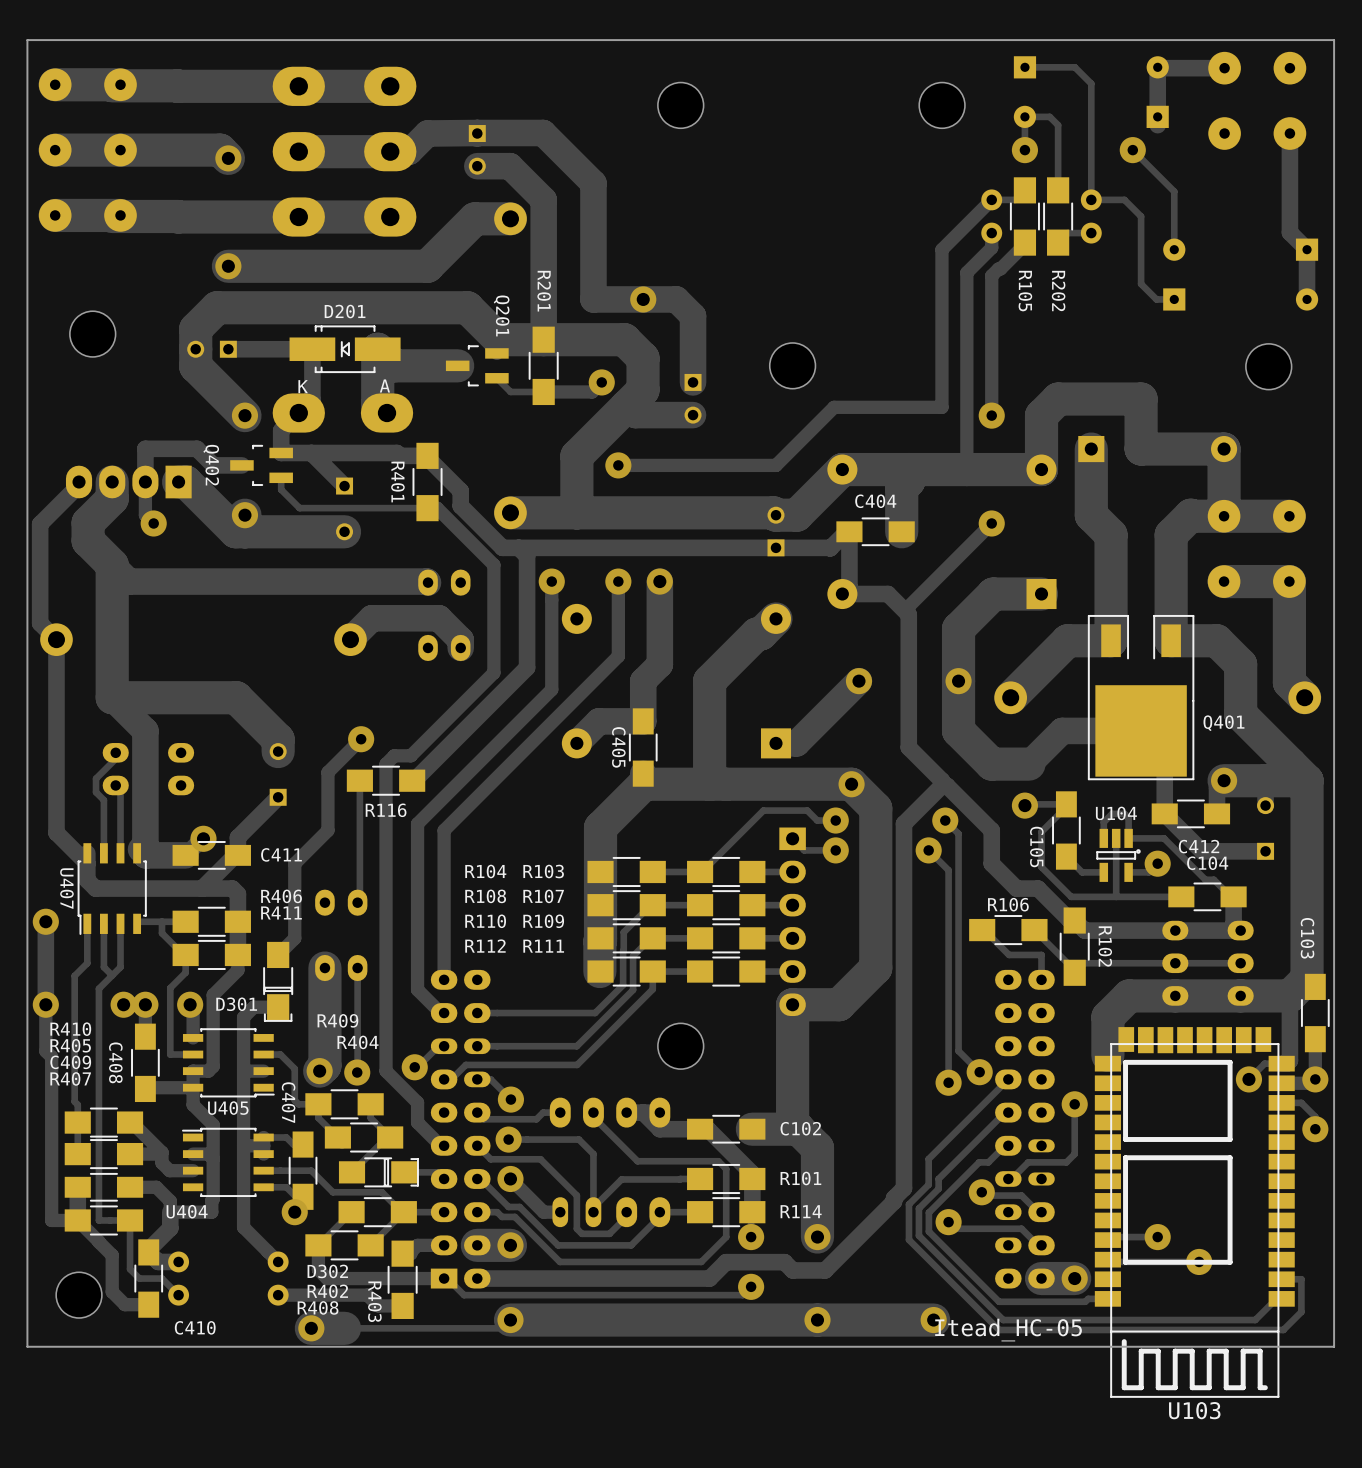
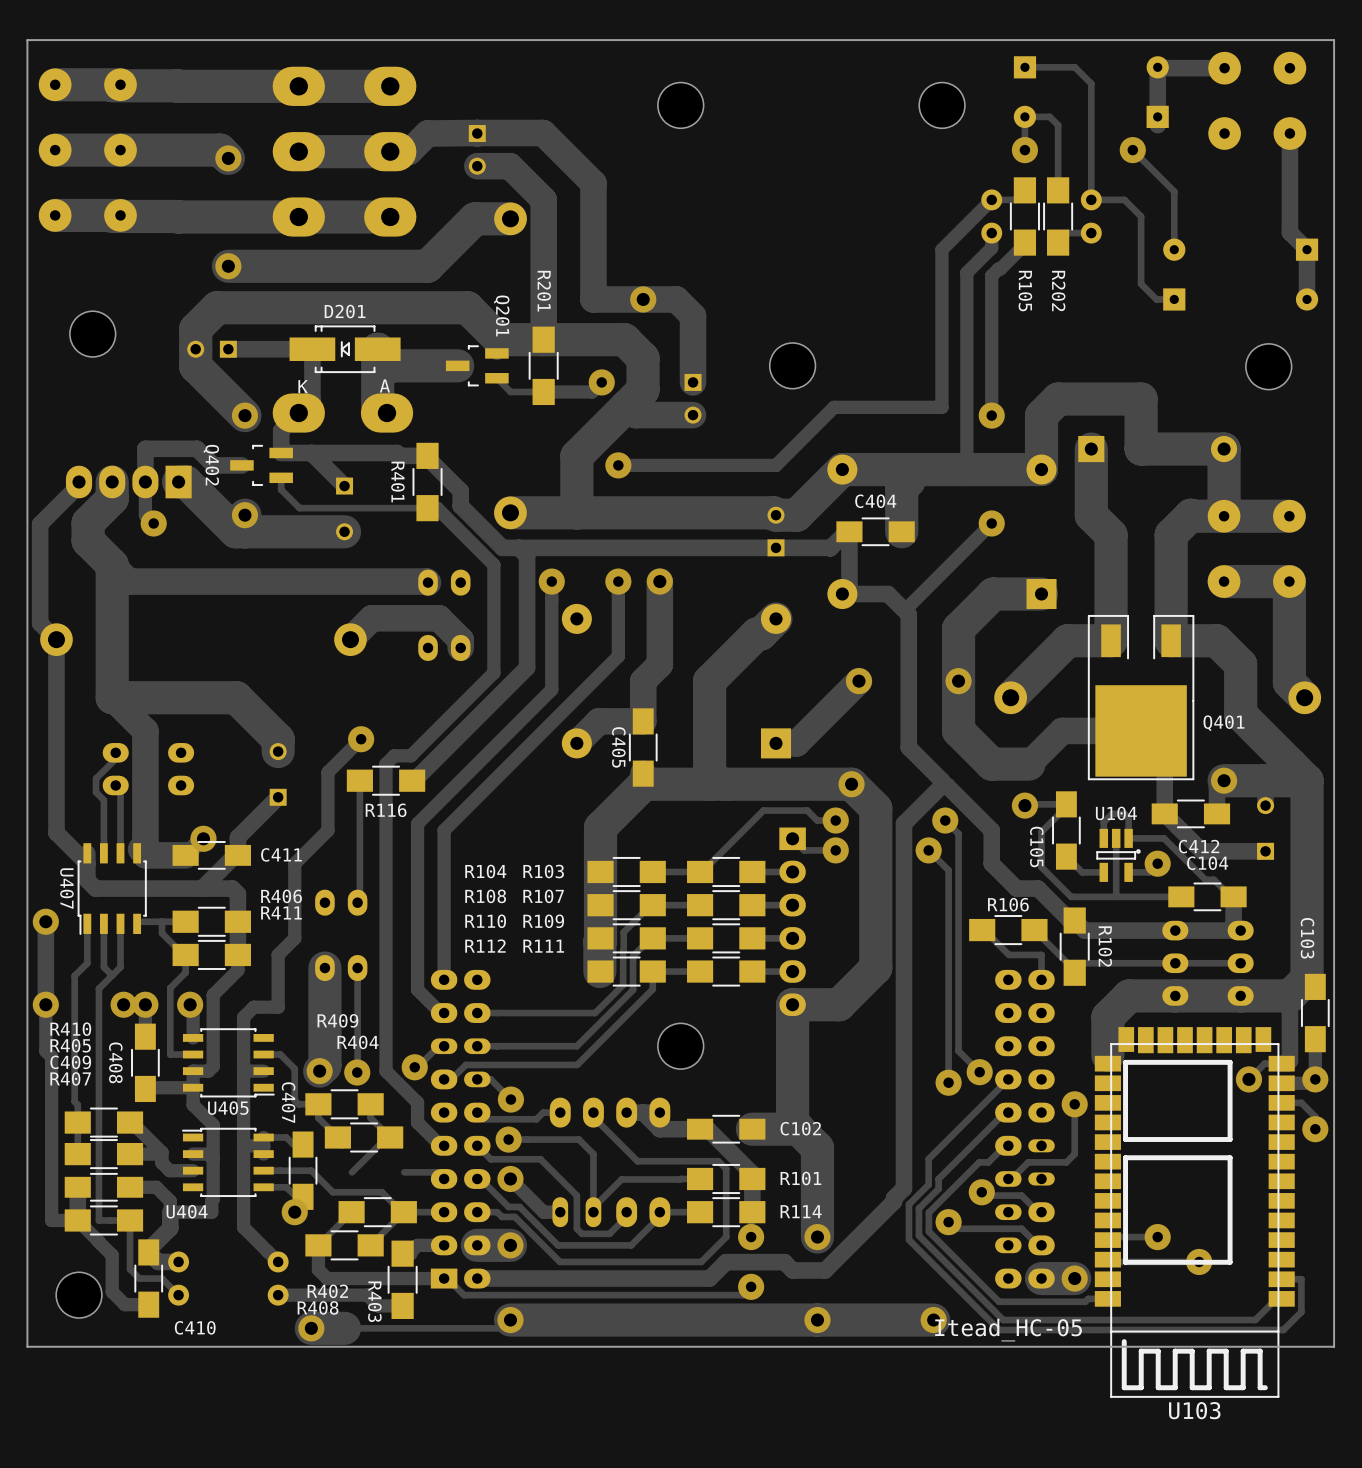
track: none -> (278, 954) (278, 1007)
D301: (278, 981) -> none
D302: (378, 1172) -> none

